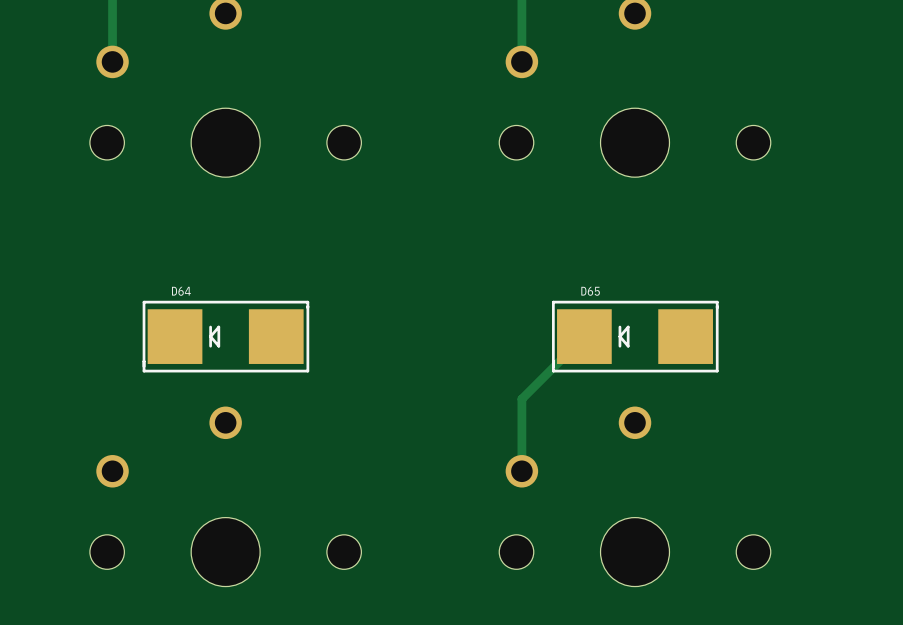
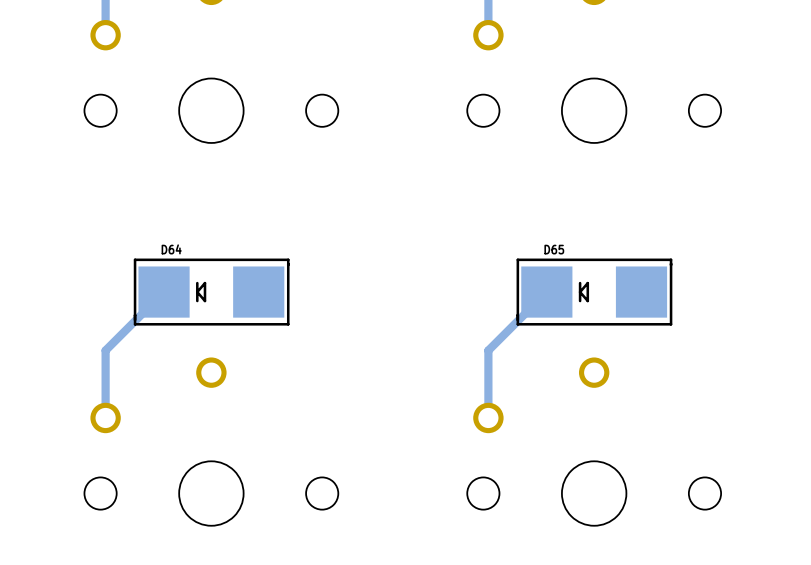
track: none -> (164, 292) (105, 350) (105, 417)

